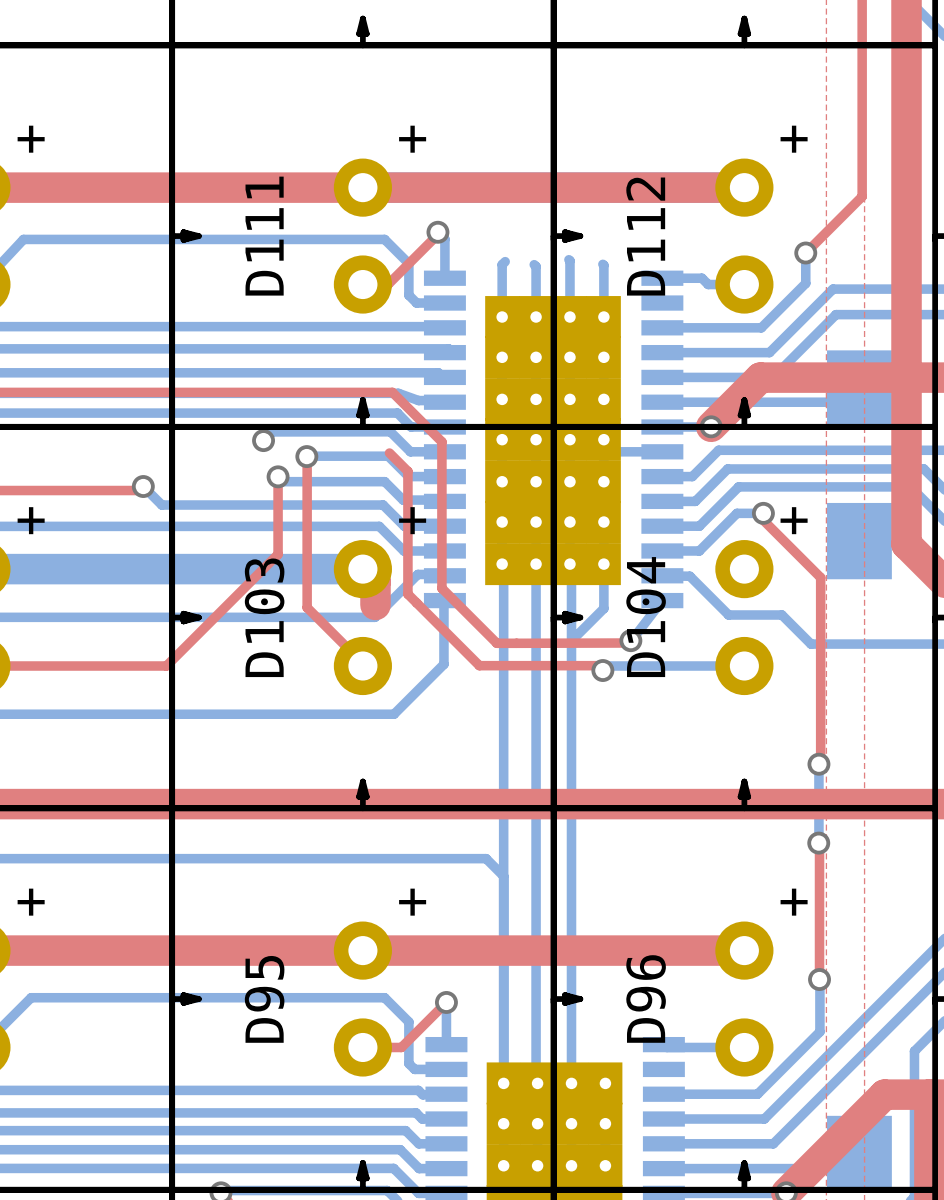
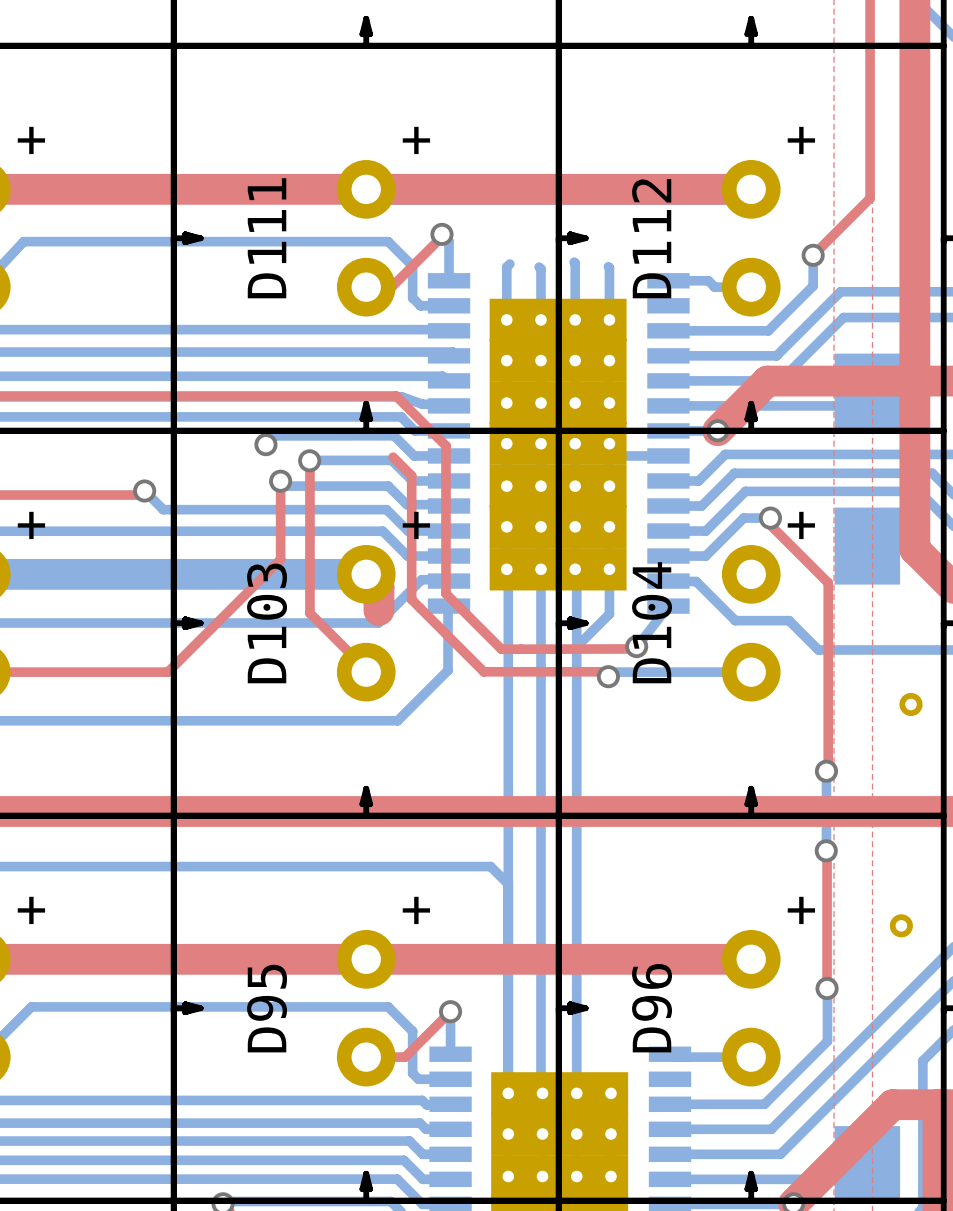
part: none -> (911, 704)
part: none -> (901, 925)

